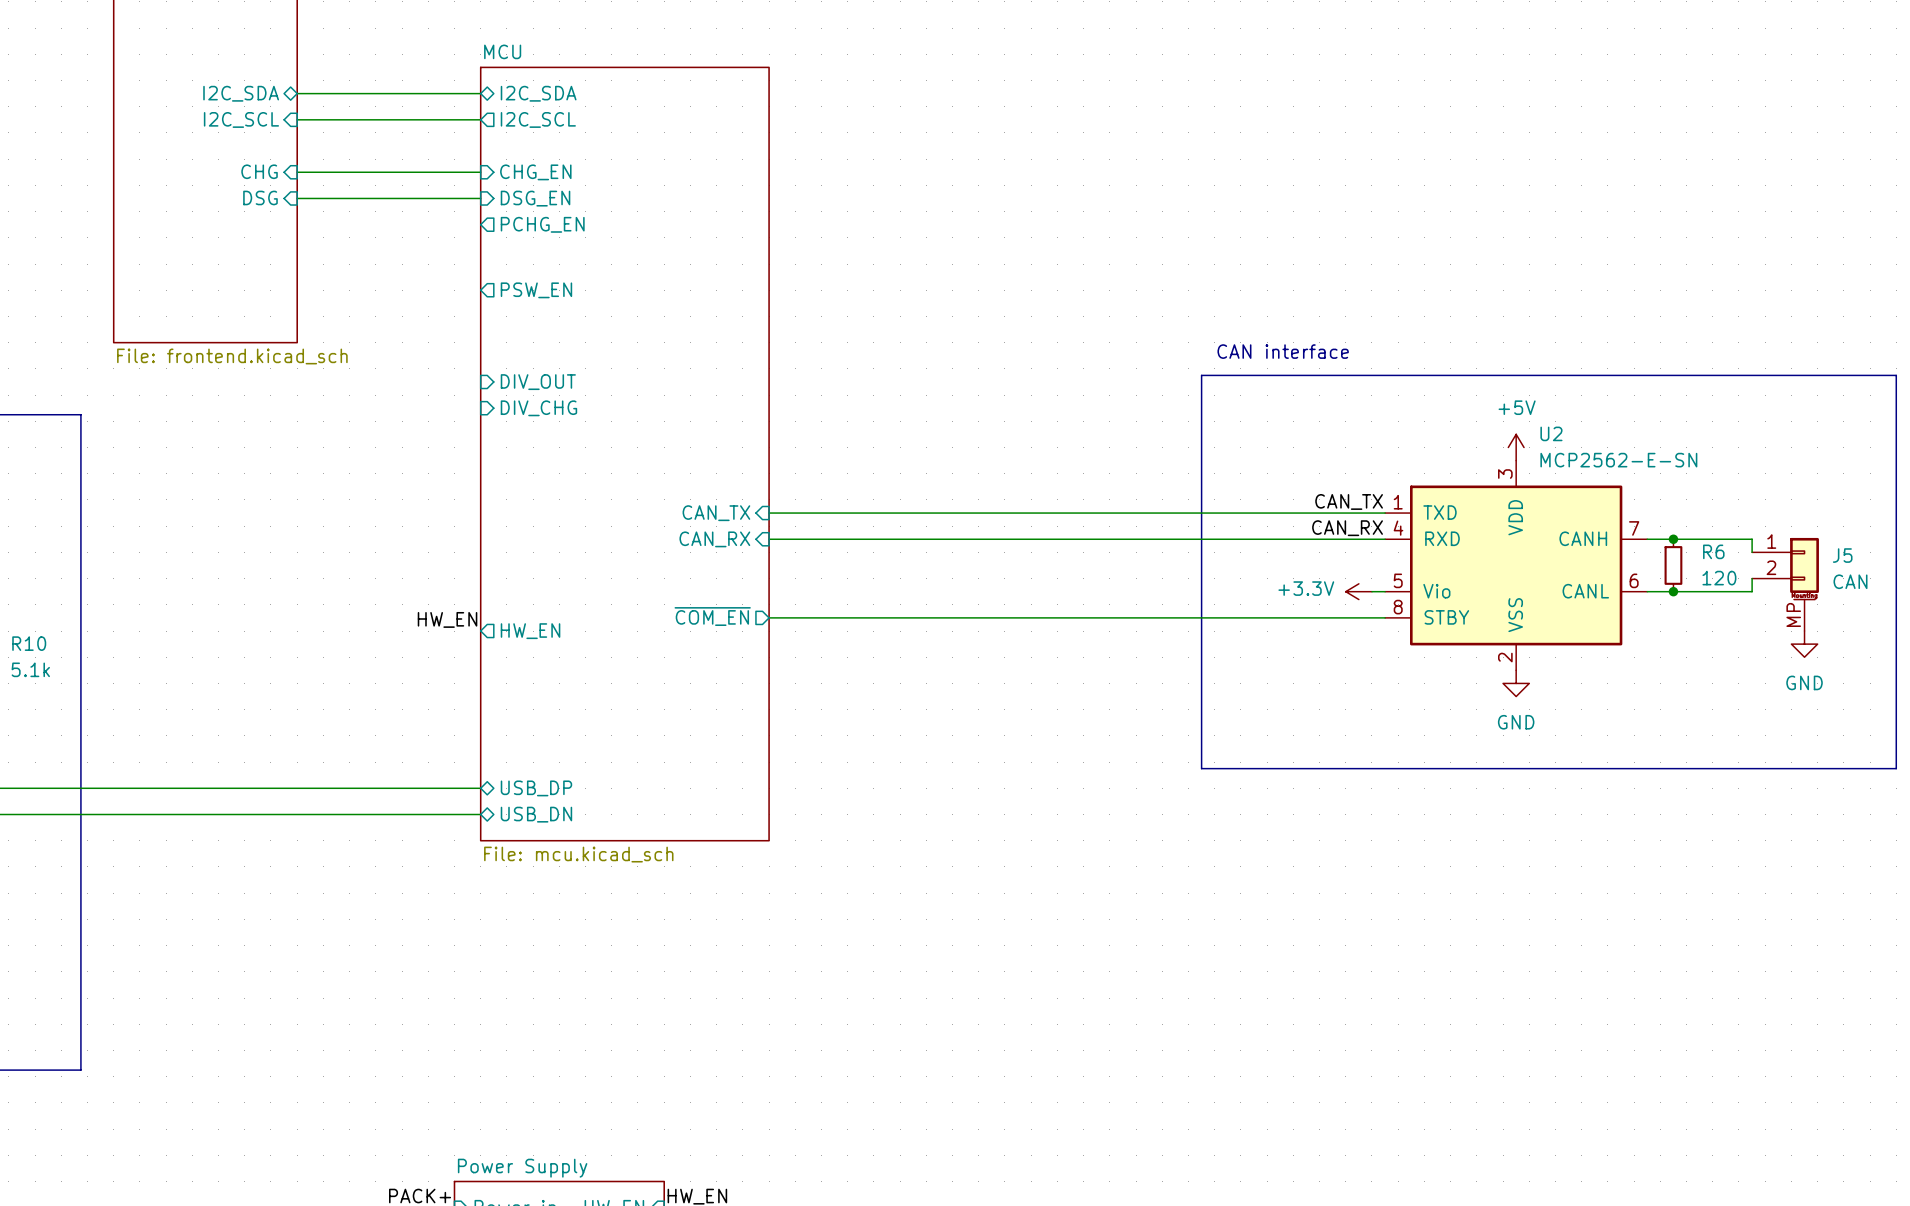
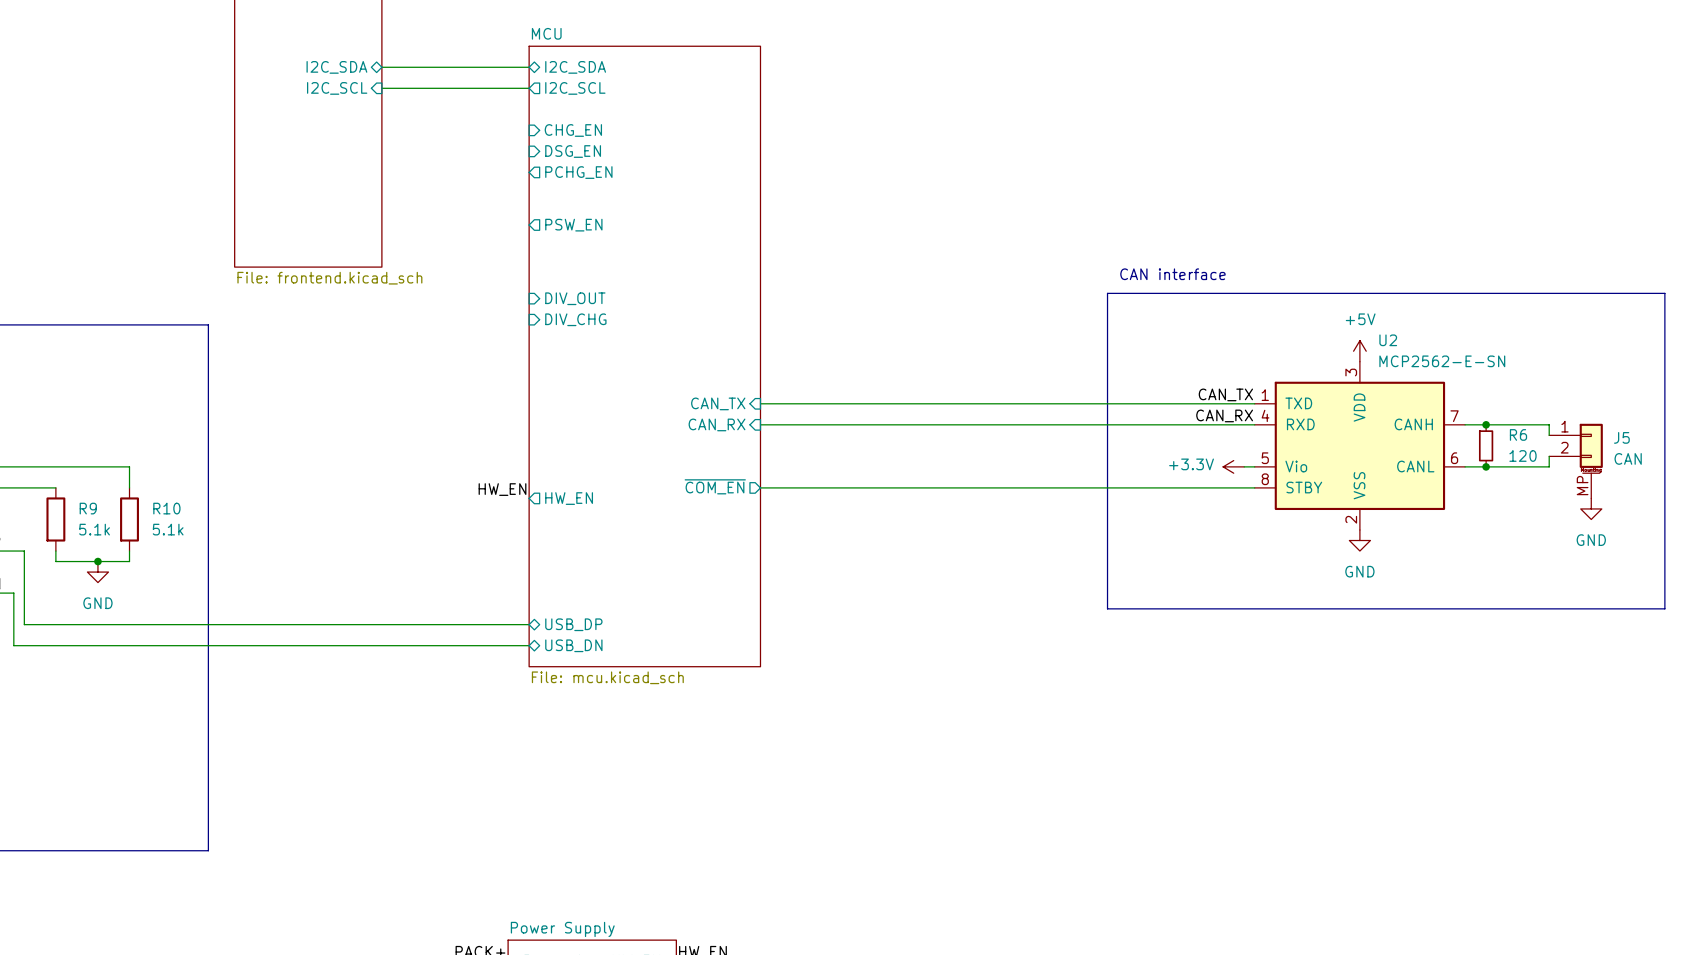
sheet pin: CHG (259, 171) -> none
wire: (297, 172) (480, 172) -> none
sheet pin: DSG (260, 197) -> none
wire: (297, 198) (480, 198) -> none

